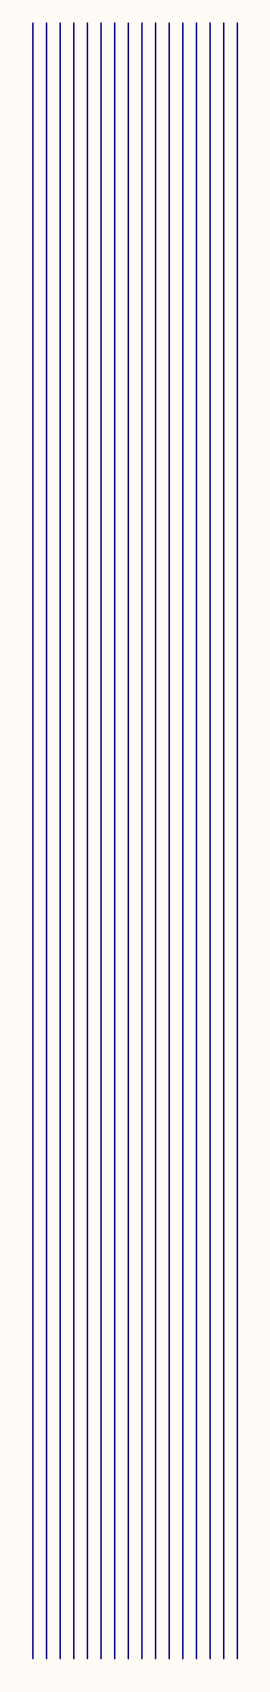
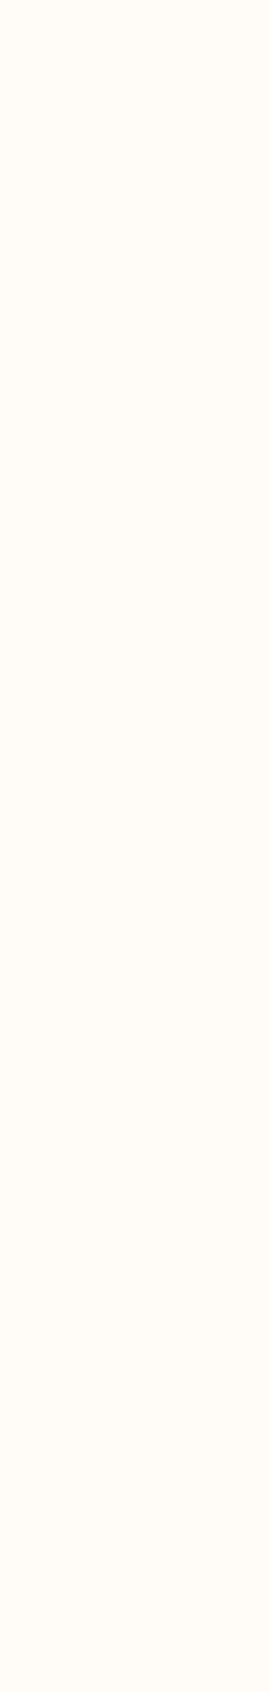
wire: (32, 23) (32, 1658) -> none
wire: (46, 23) (46, 1658) -> none
wire: (60, 23) (60, 1658) -> none
wire: (73, 23) (73, 1658) -> none
wire: (87, 23) (87, 1658) -> none
wire: (101, 23) (101, 1658) -> none
wire: (114, 23) (114, 1658) -> none
wire: (128, 23) (128, 1658) -> none
wire: (141, 23) (141, 1658) -> none
wire: (155, 23) (155, 1658) -> none
wire: (169, 23) (169, 1658) -> none
wire: (182, 23) (182, 1658) -> none
wire: (196, 23) (196, 1658) -> none
wire: (210, 23) (210, 1658) -> none
wire: (223, 23) (223, 1658) -> none
wire: (237, 23) (237, 1658) -> none

